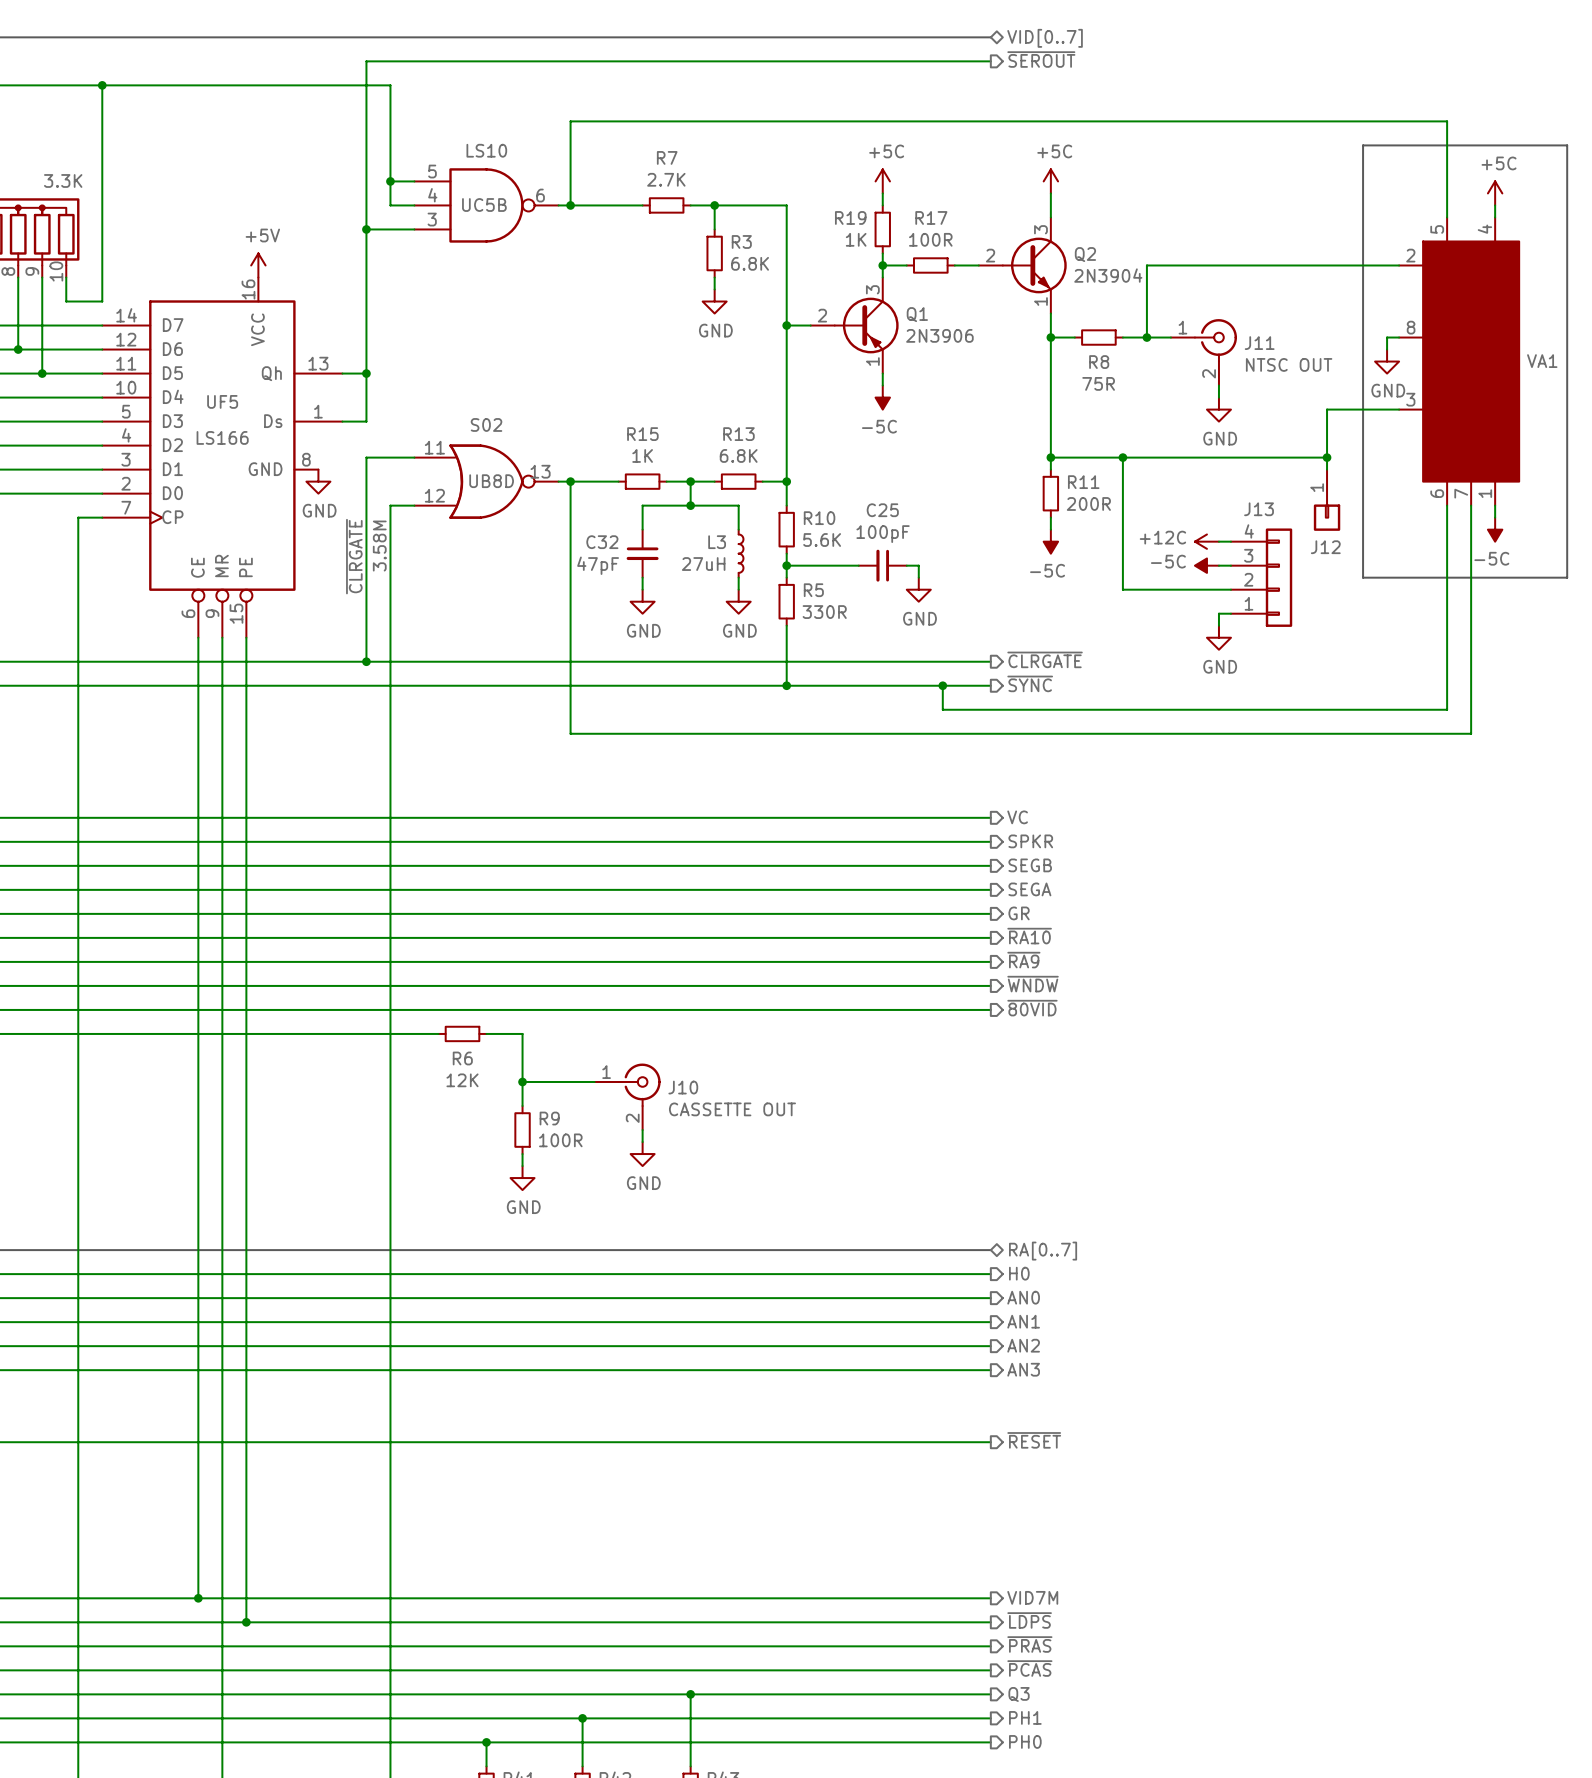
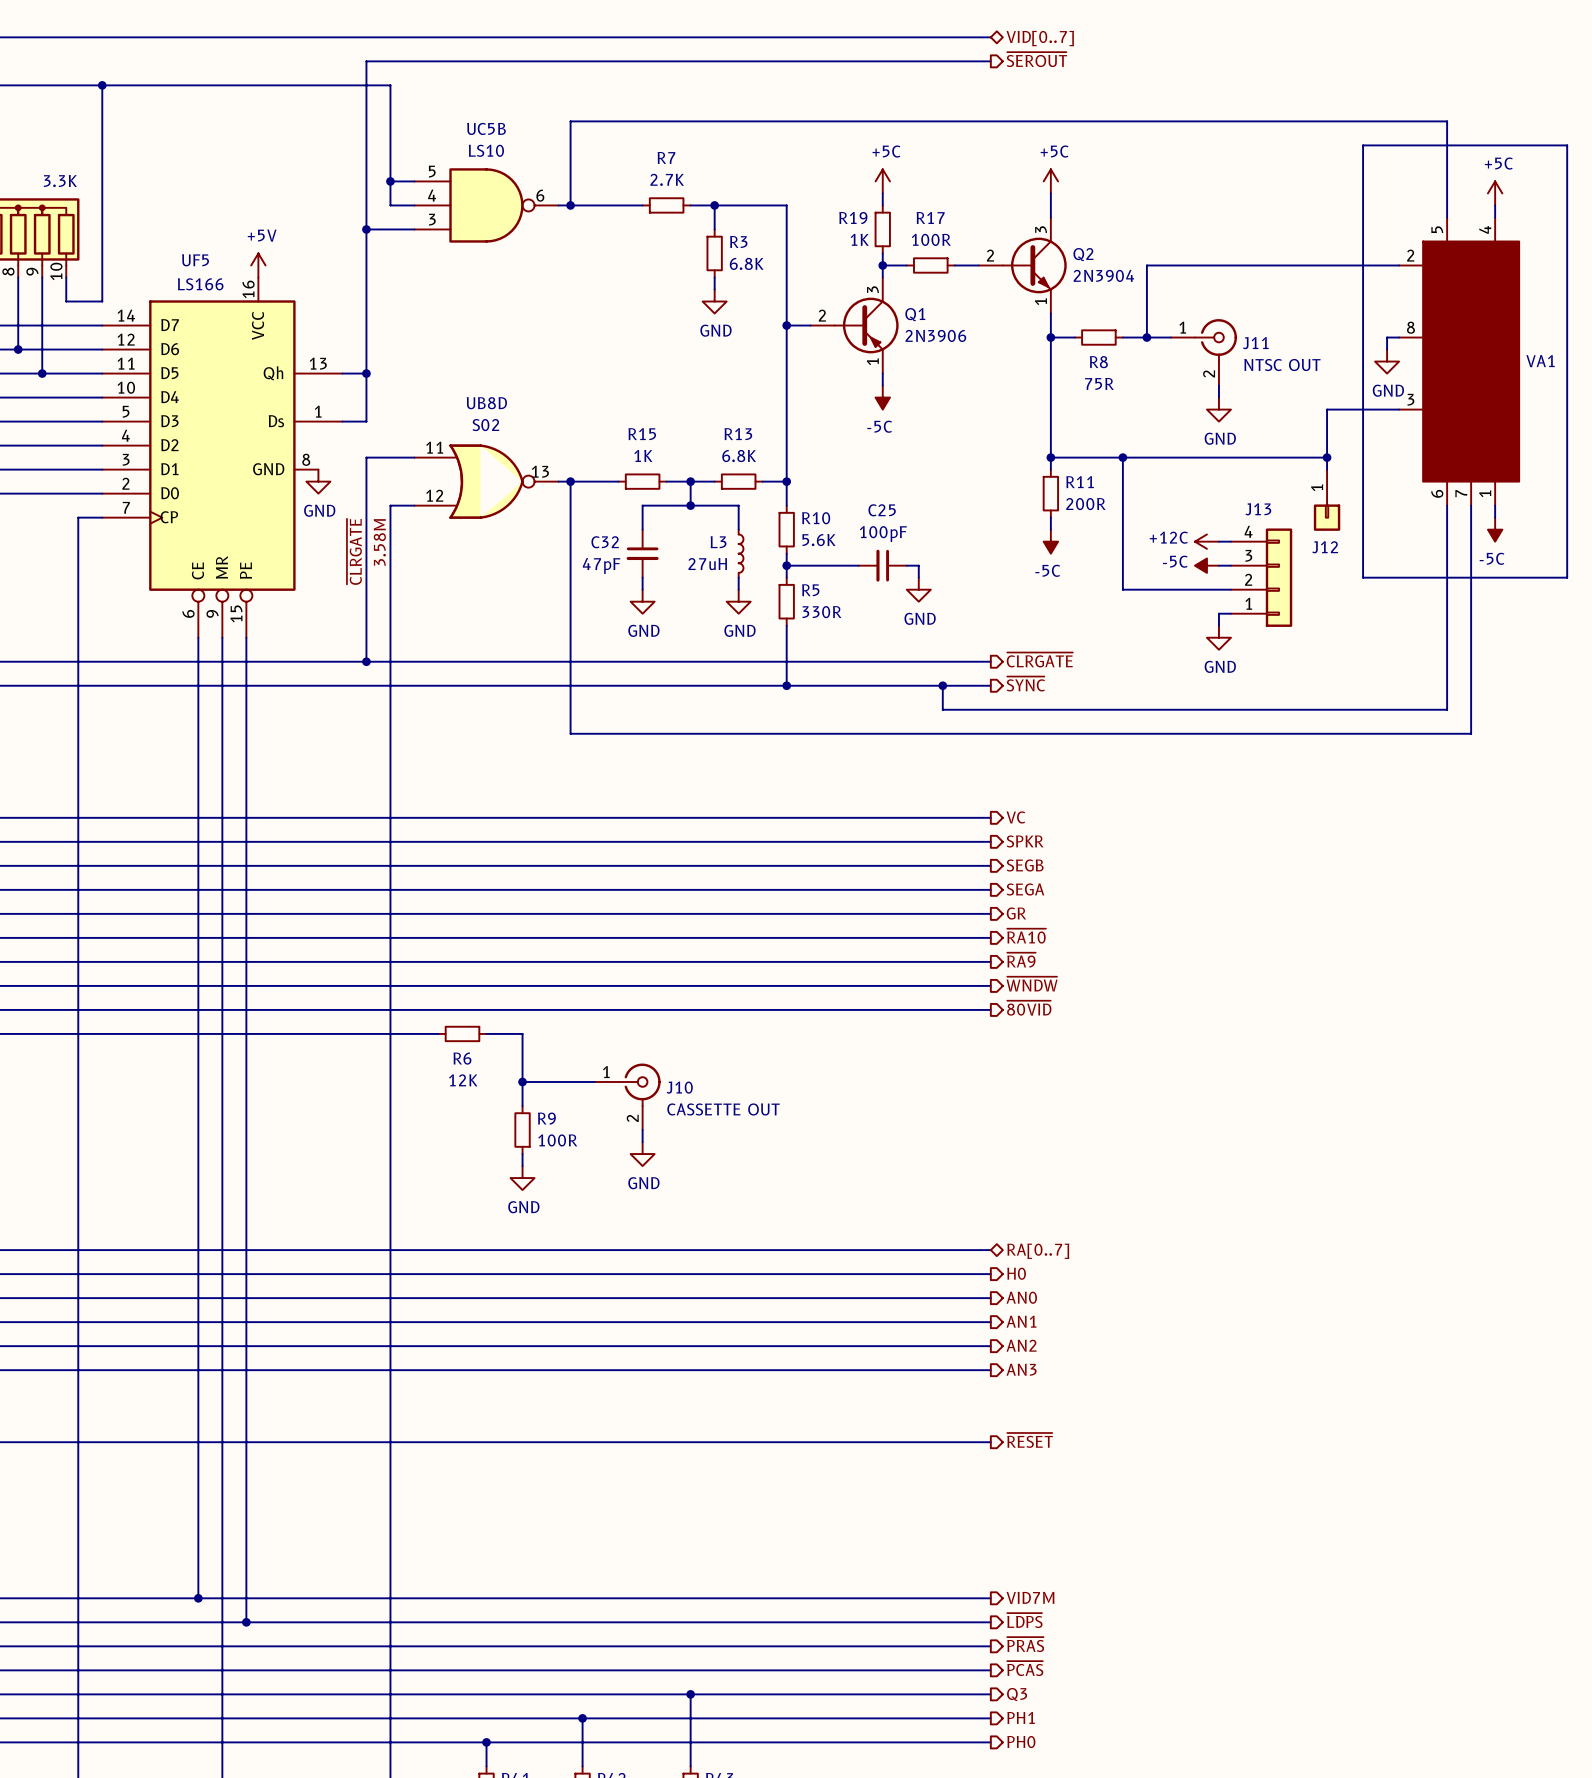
UC5B name position: UC5B (484, 205) -> UC5B (486, 128)
UF5 name position: UF5 (222, 401) -> UF5 (195, 260)
UF5 value position: LS166 (222, 437) -> LS166 (200, 284)
UB8D name position: UB8D (491, 481) -> UB8D (486, 403)

